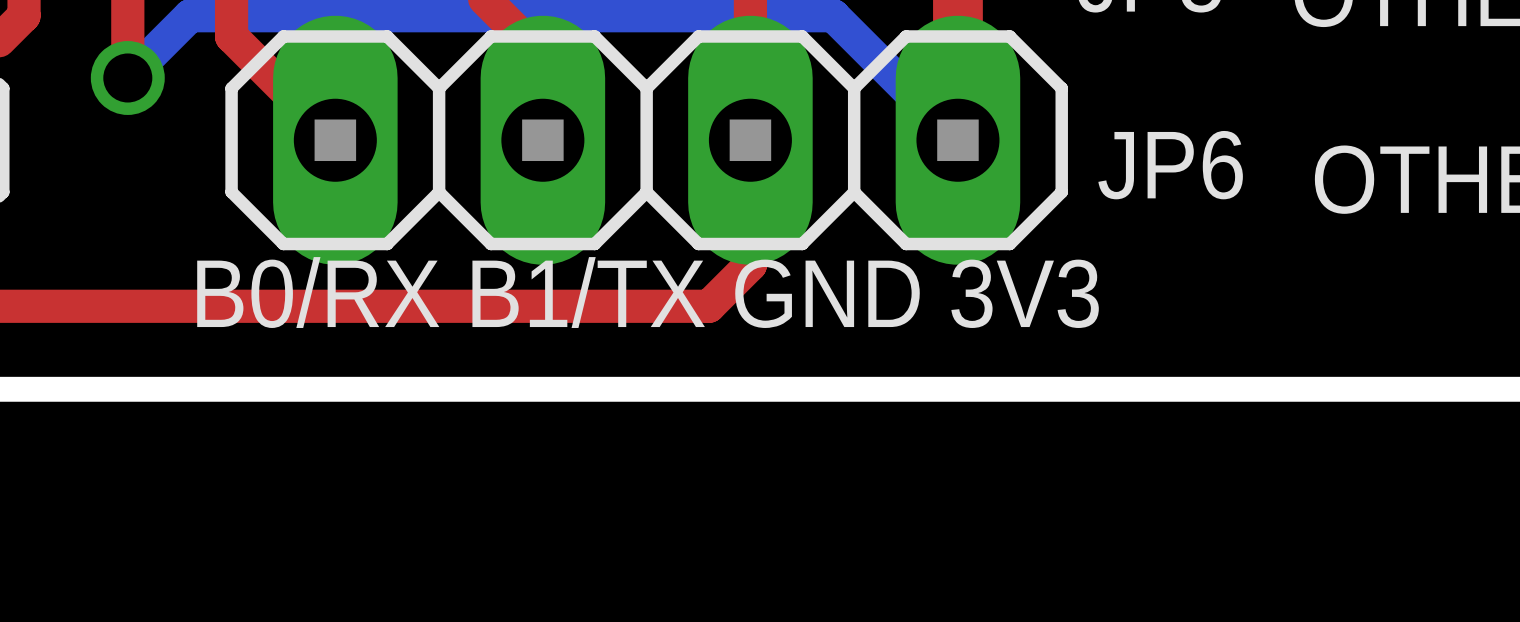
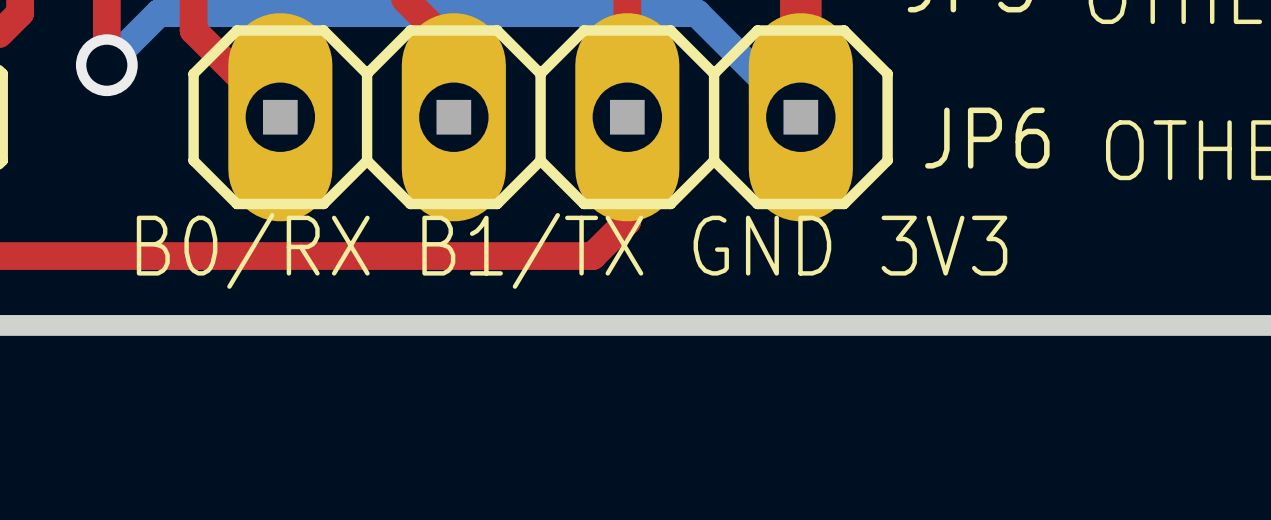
text position: B0/RX B1/TX GND 3V3 (648, 292) -> B0/RX B1/TX GND 3V3 (572, 250)

